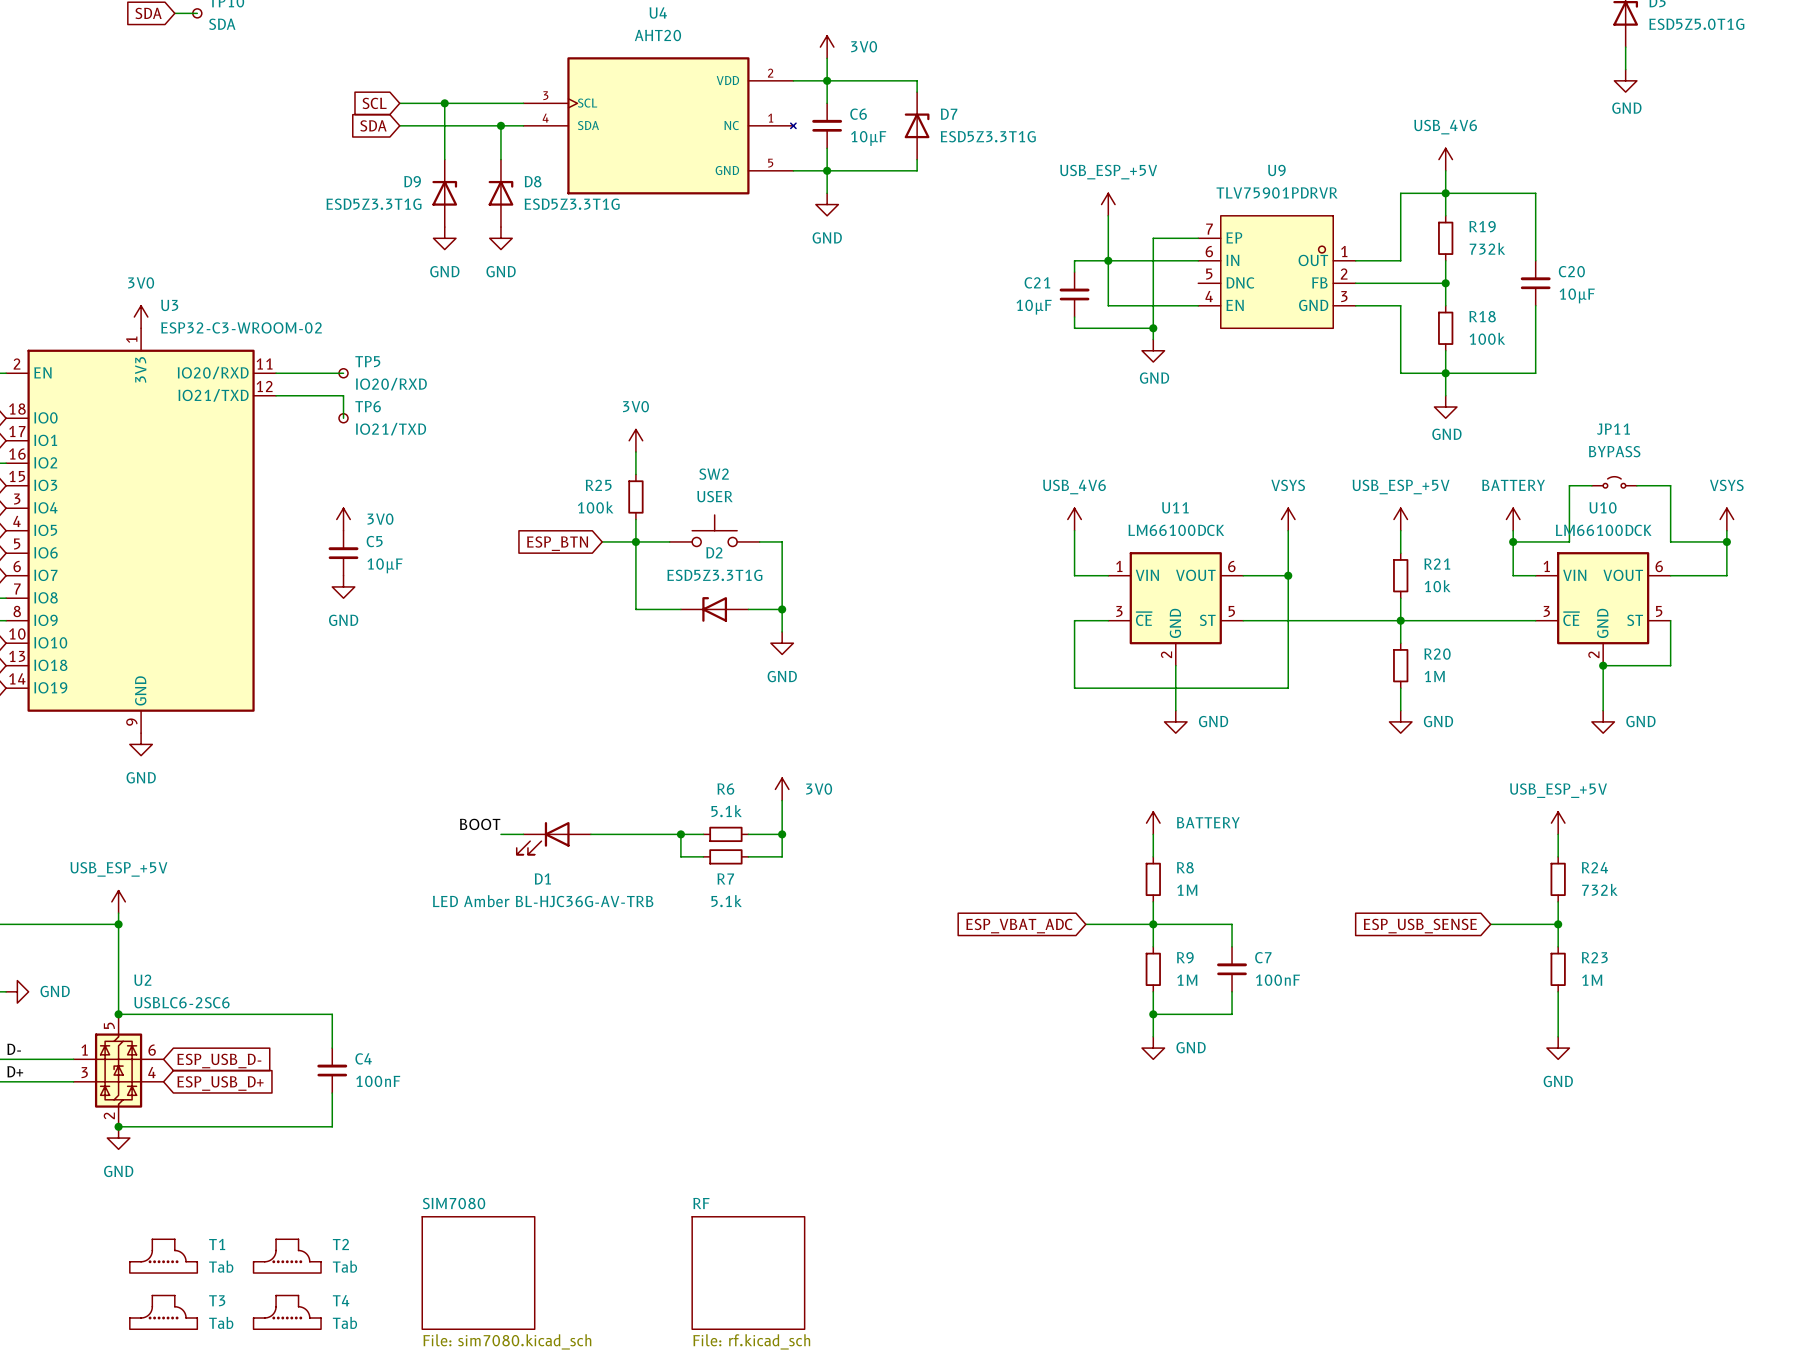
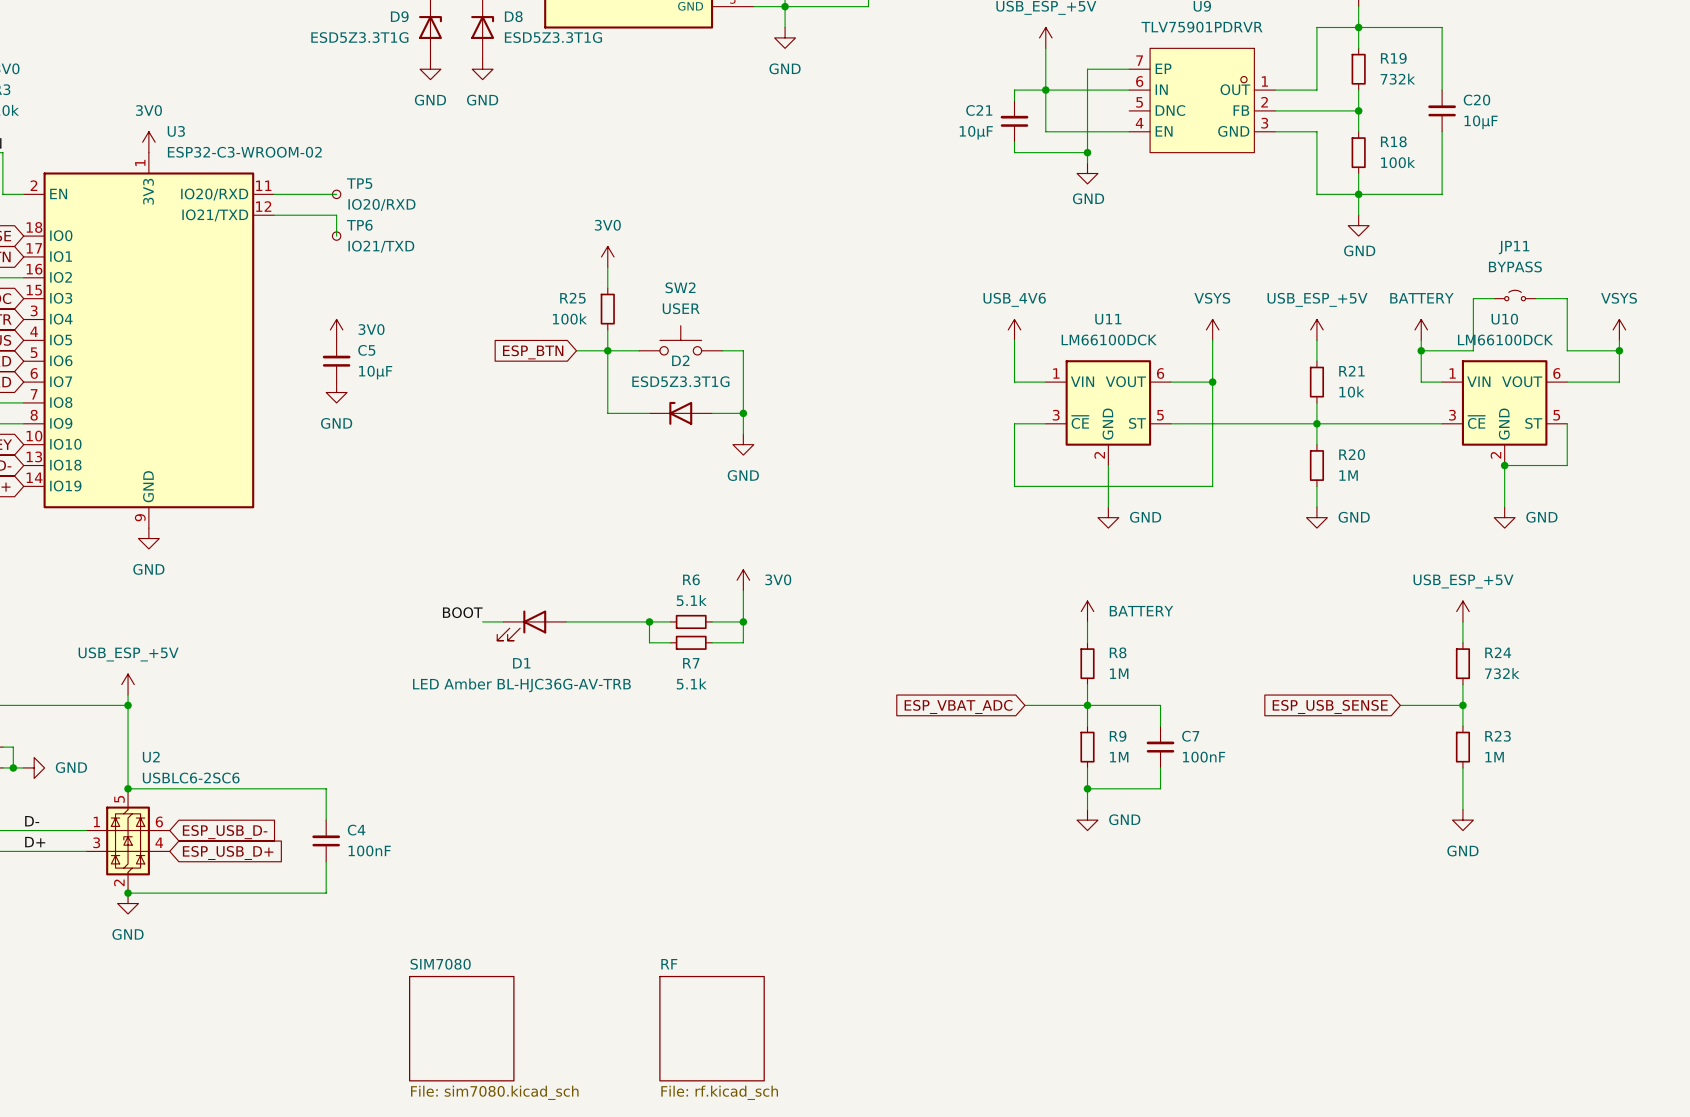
T1: Tab (163, 1256) -> none
T2: Tab (287, 1256) -> none
T3: Tab (163, 1312) -> none
T4: Tab (287, 1312) -> none

